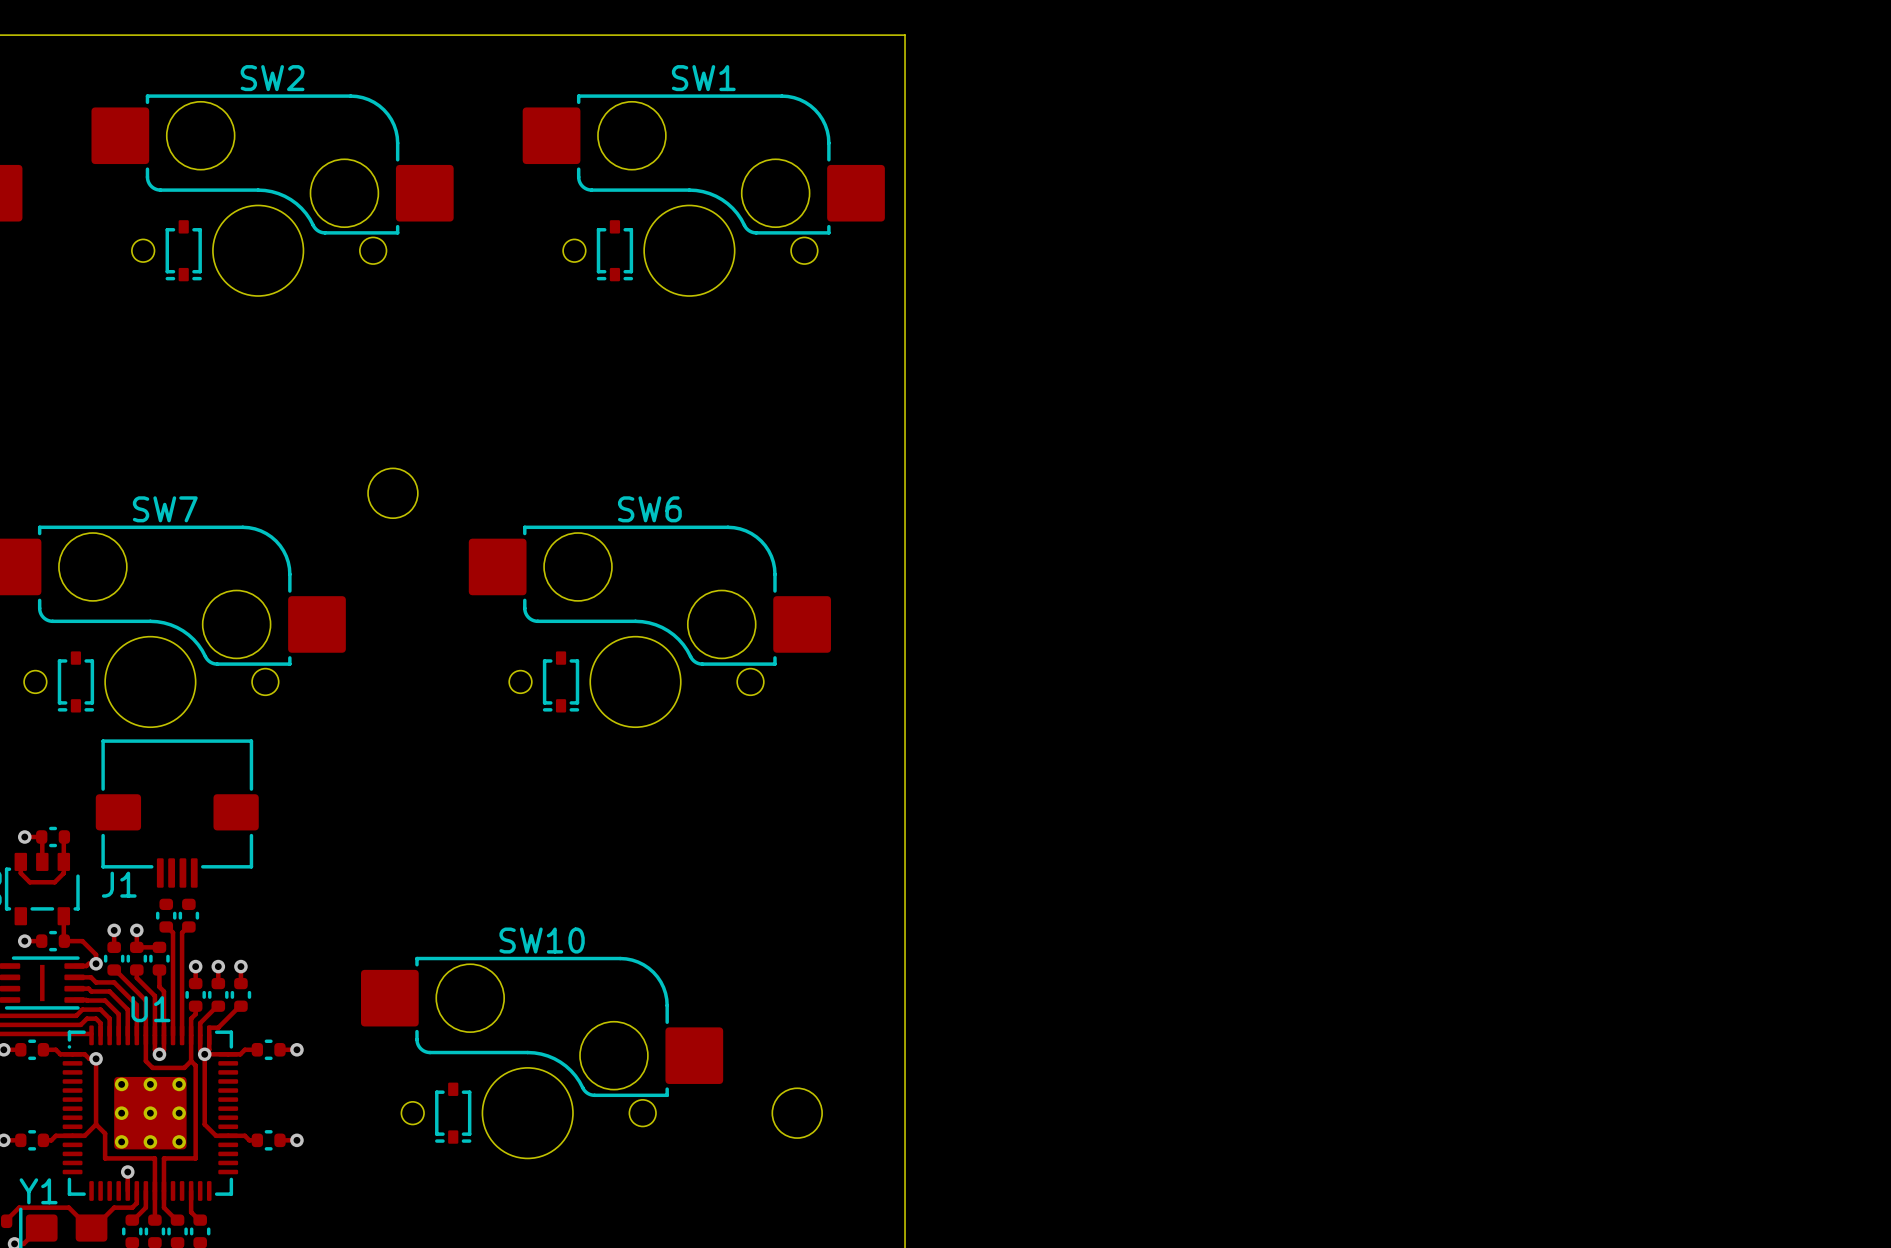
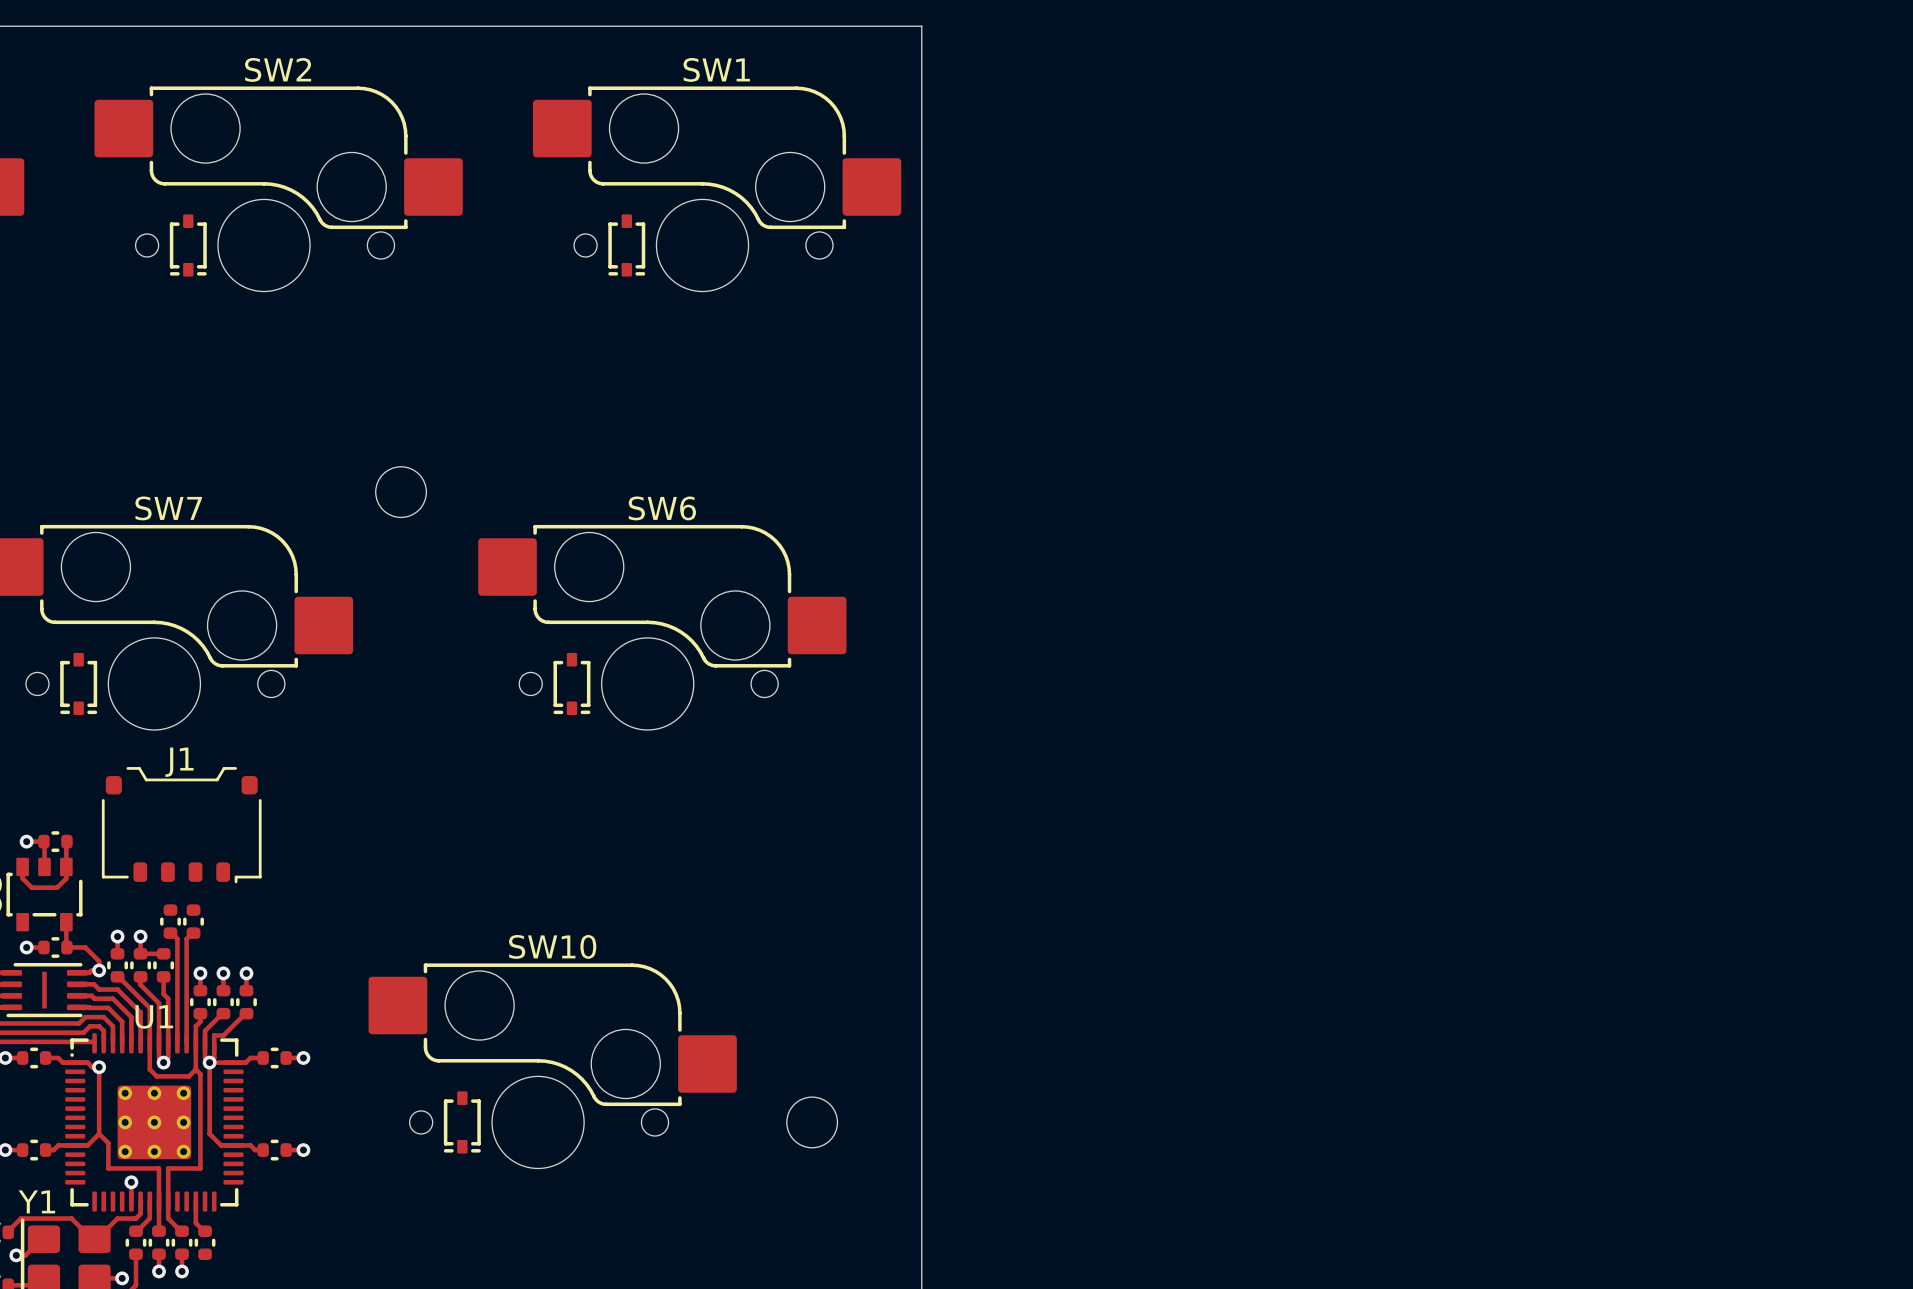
J1 footprint: [95, 739, 259, 888] -> [101, 767, 262, 884]
J1 name position: J1 (119, 884) -> J1 (179, 762)

